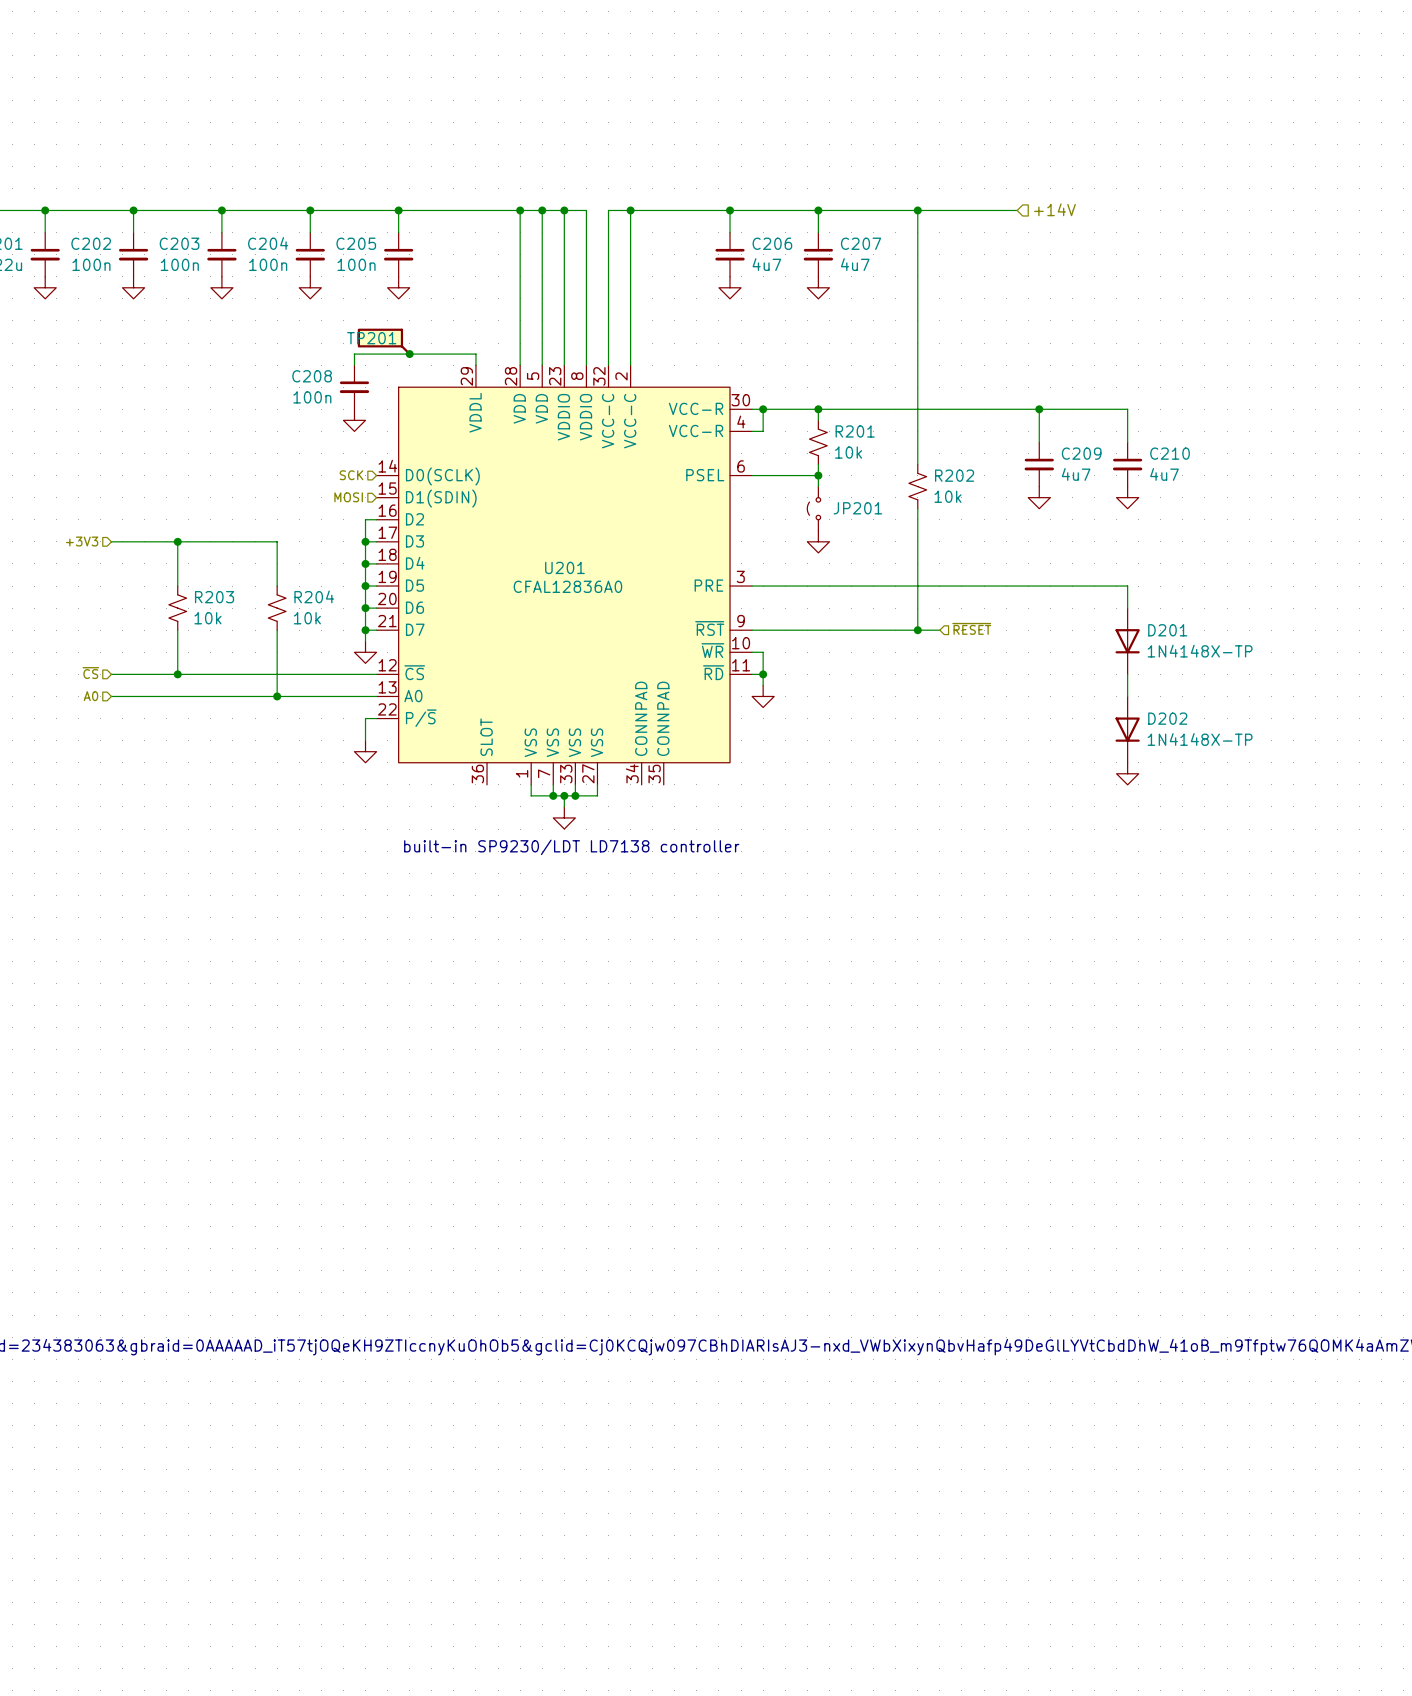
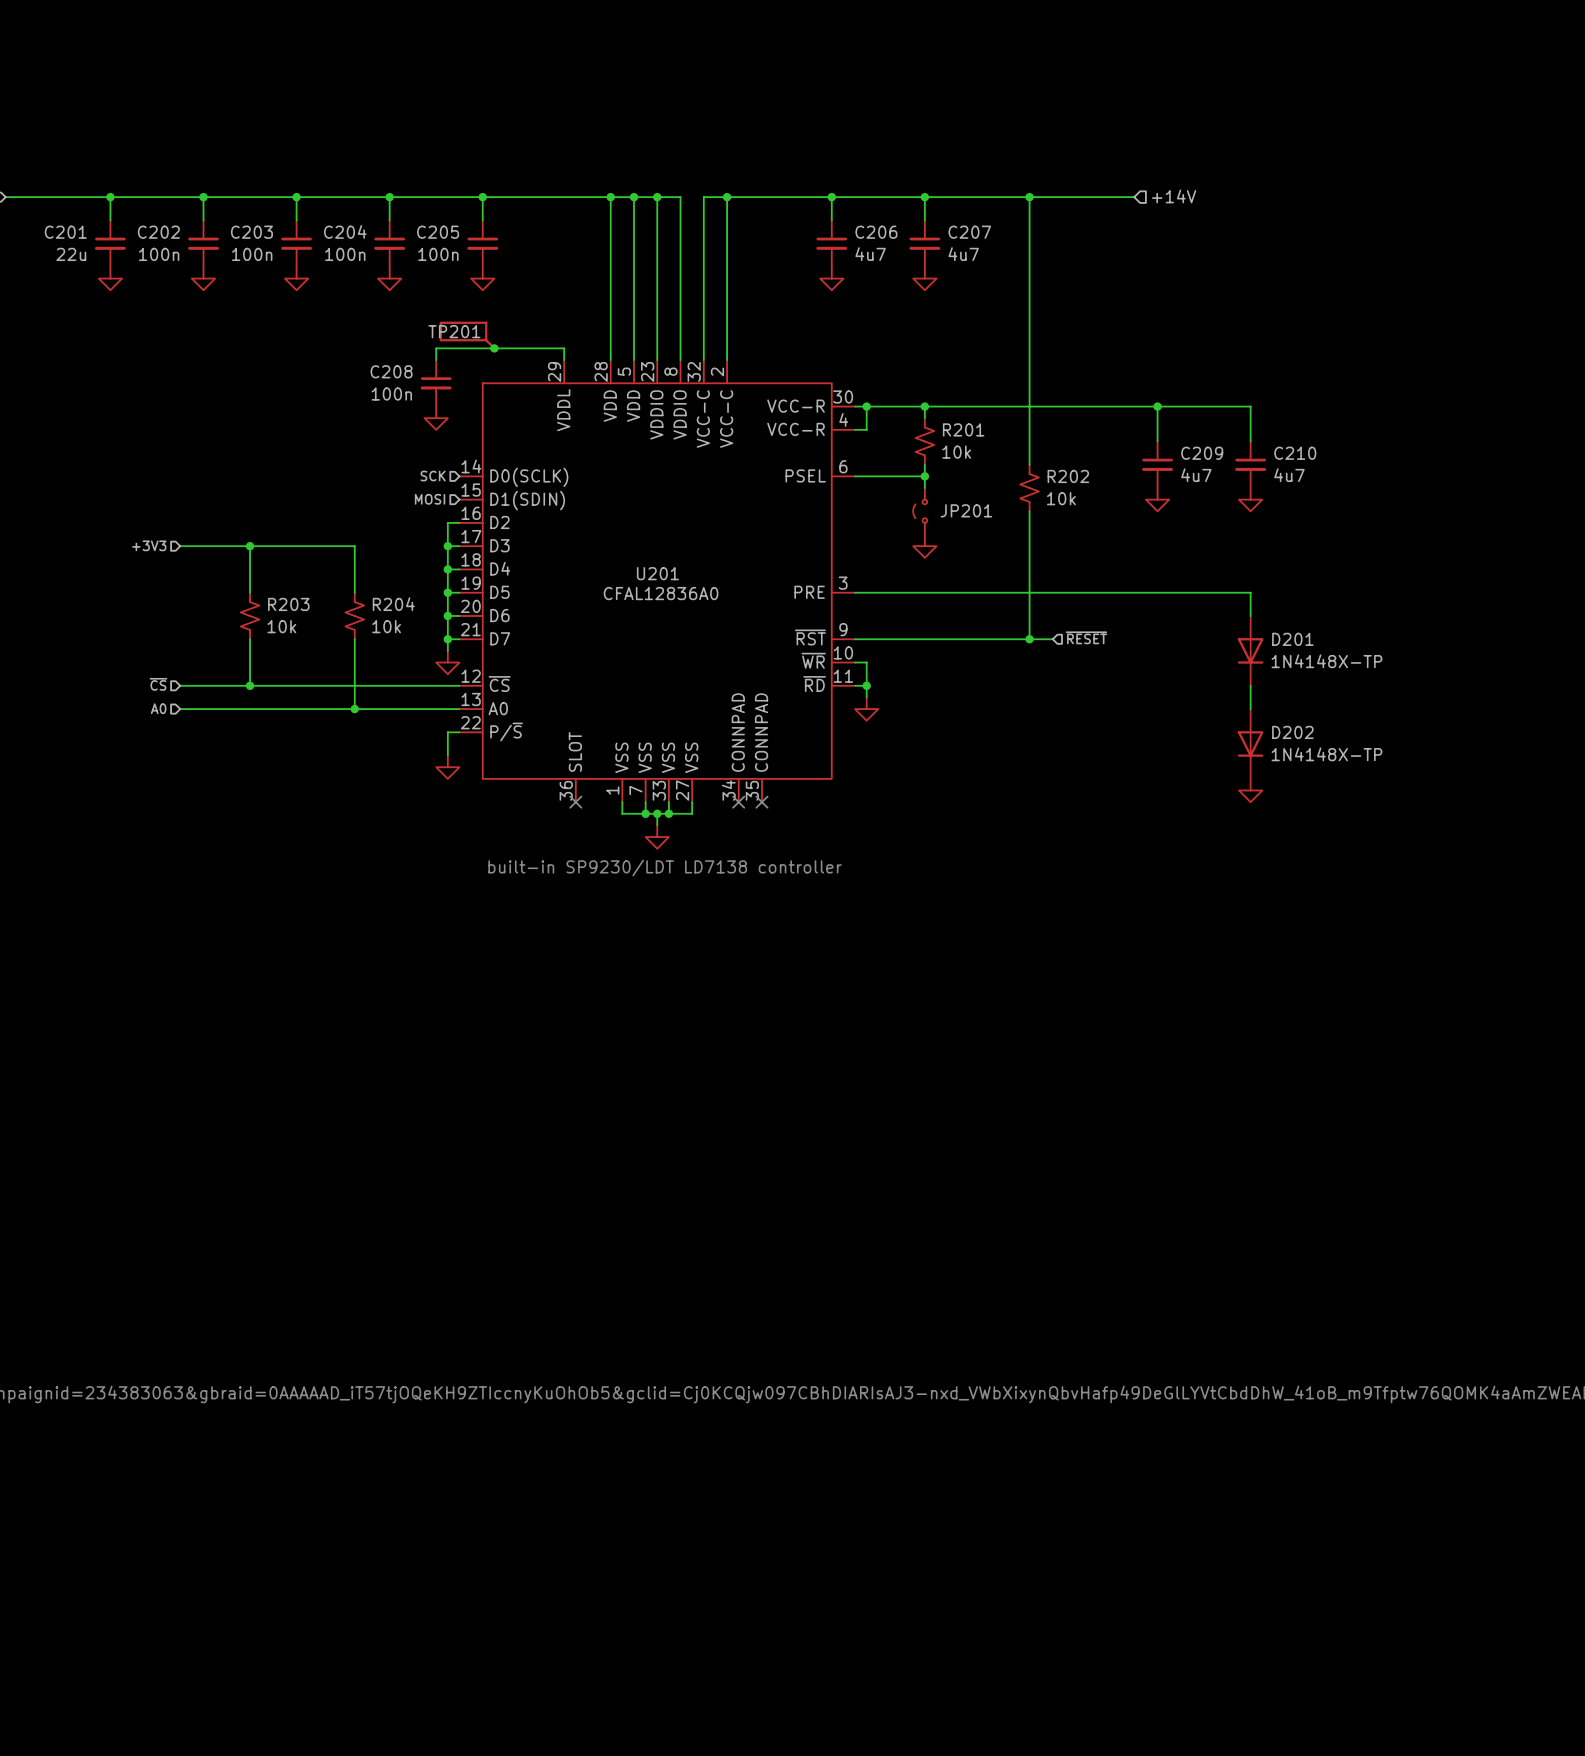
no-connect mark: none -> (575, 802)
no-connect mark: none -> (738, 802)
no-connect mark: none -> (761, 802)

